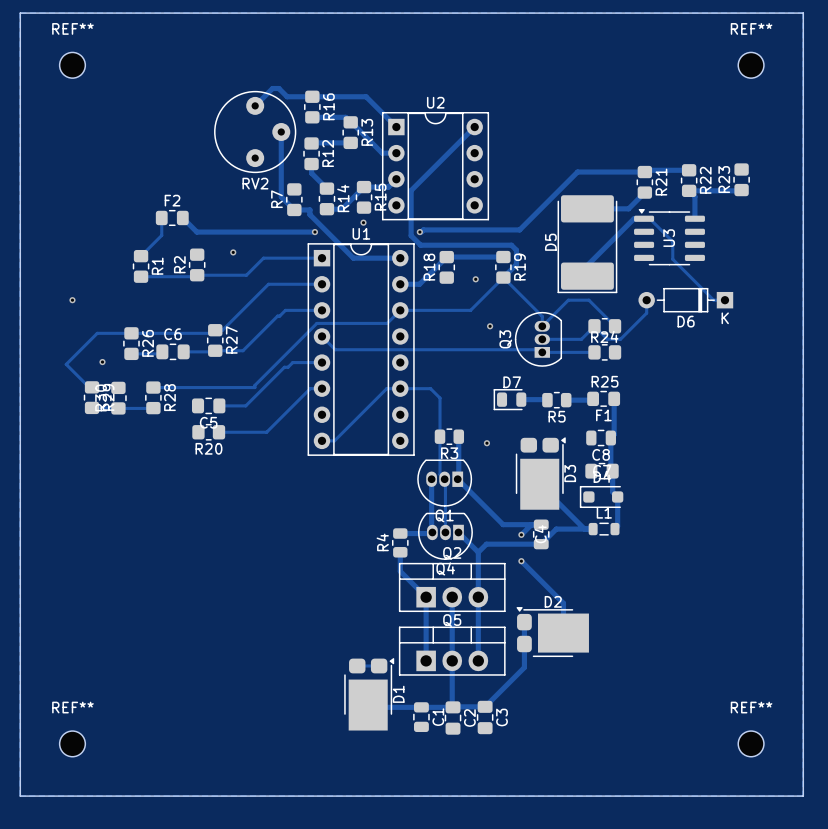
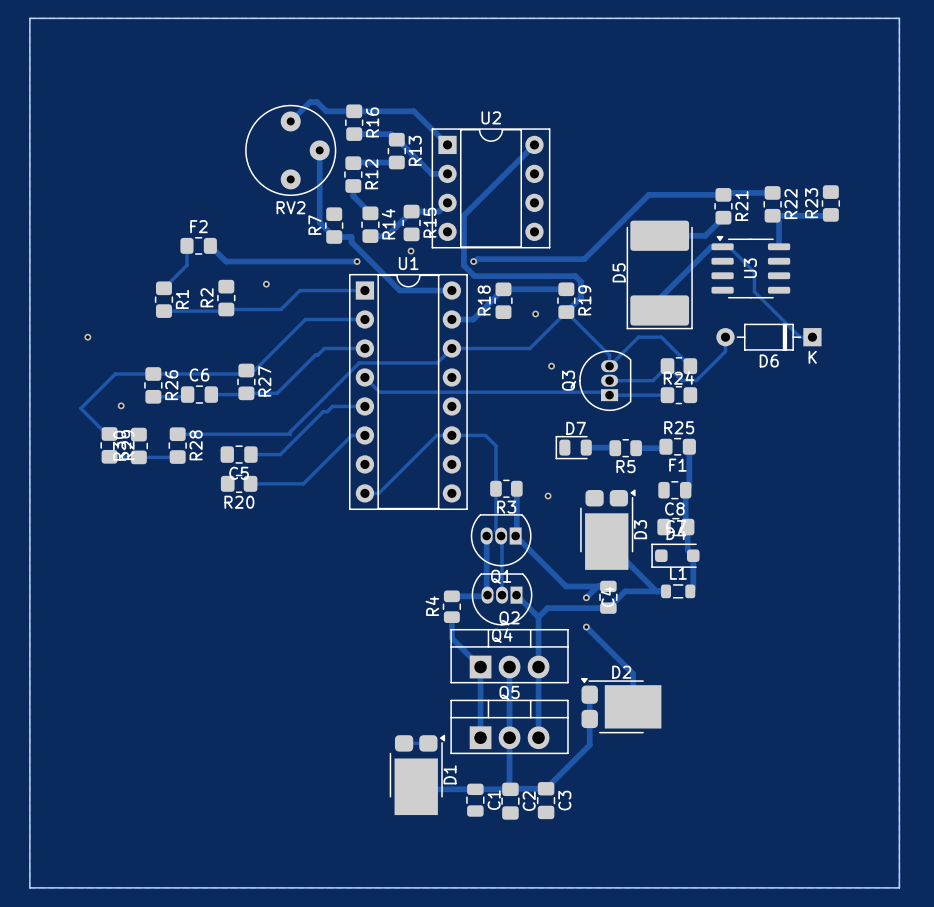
REF**: (72, 65) -> none
REF**: (751, 65) -> none
REF**: (72, 743) -> none
REF**: (751, 743) -> none

